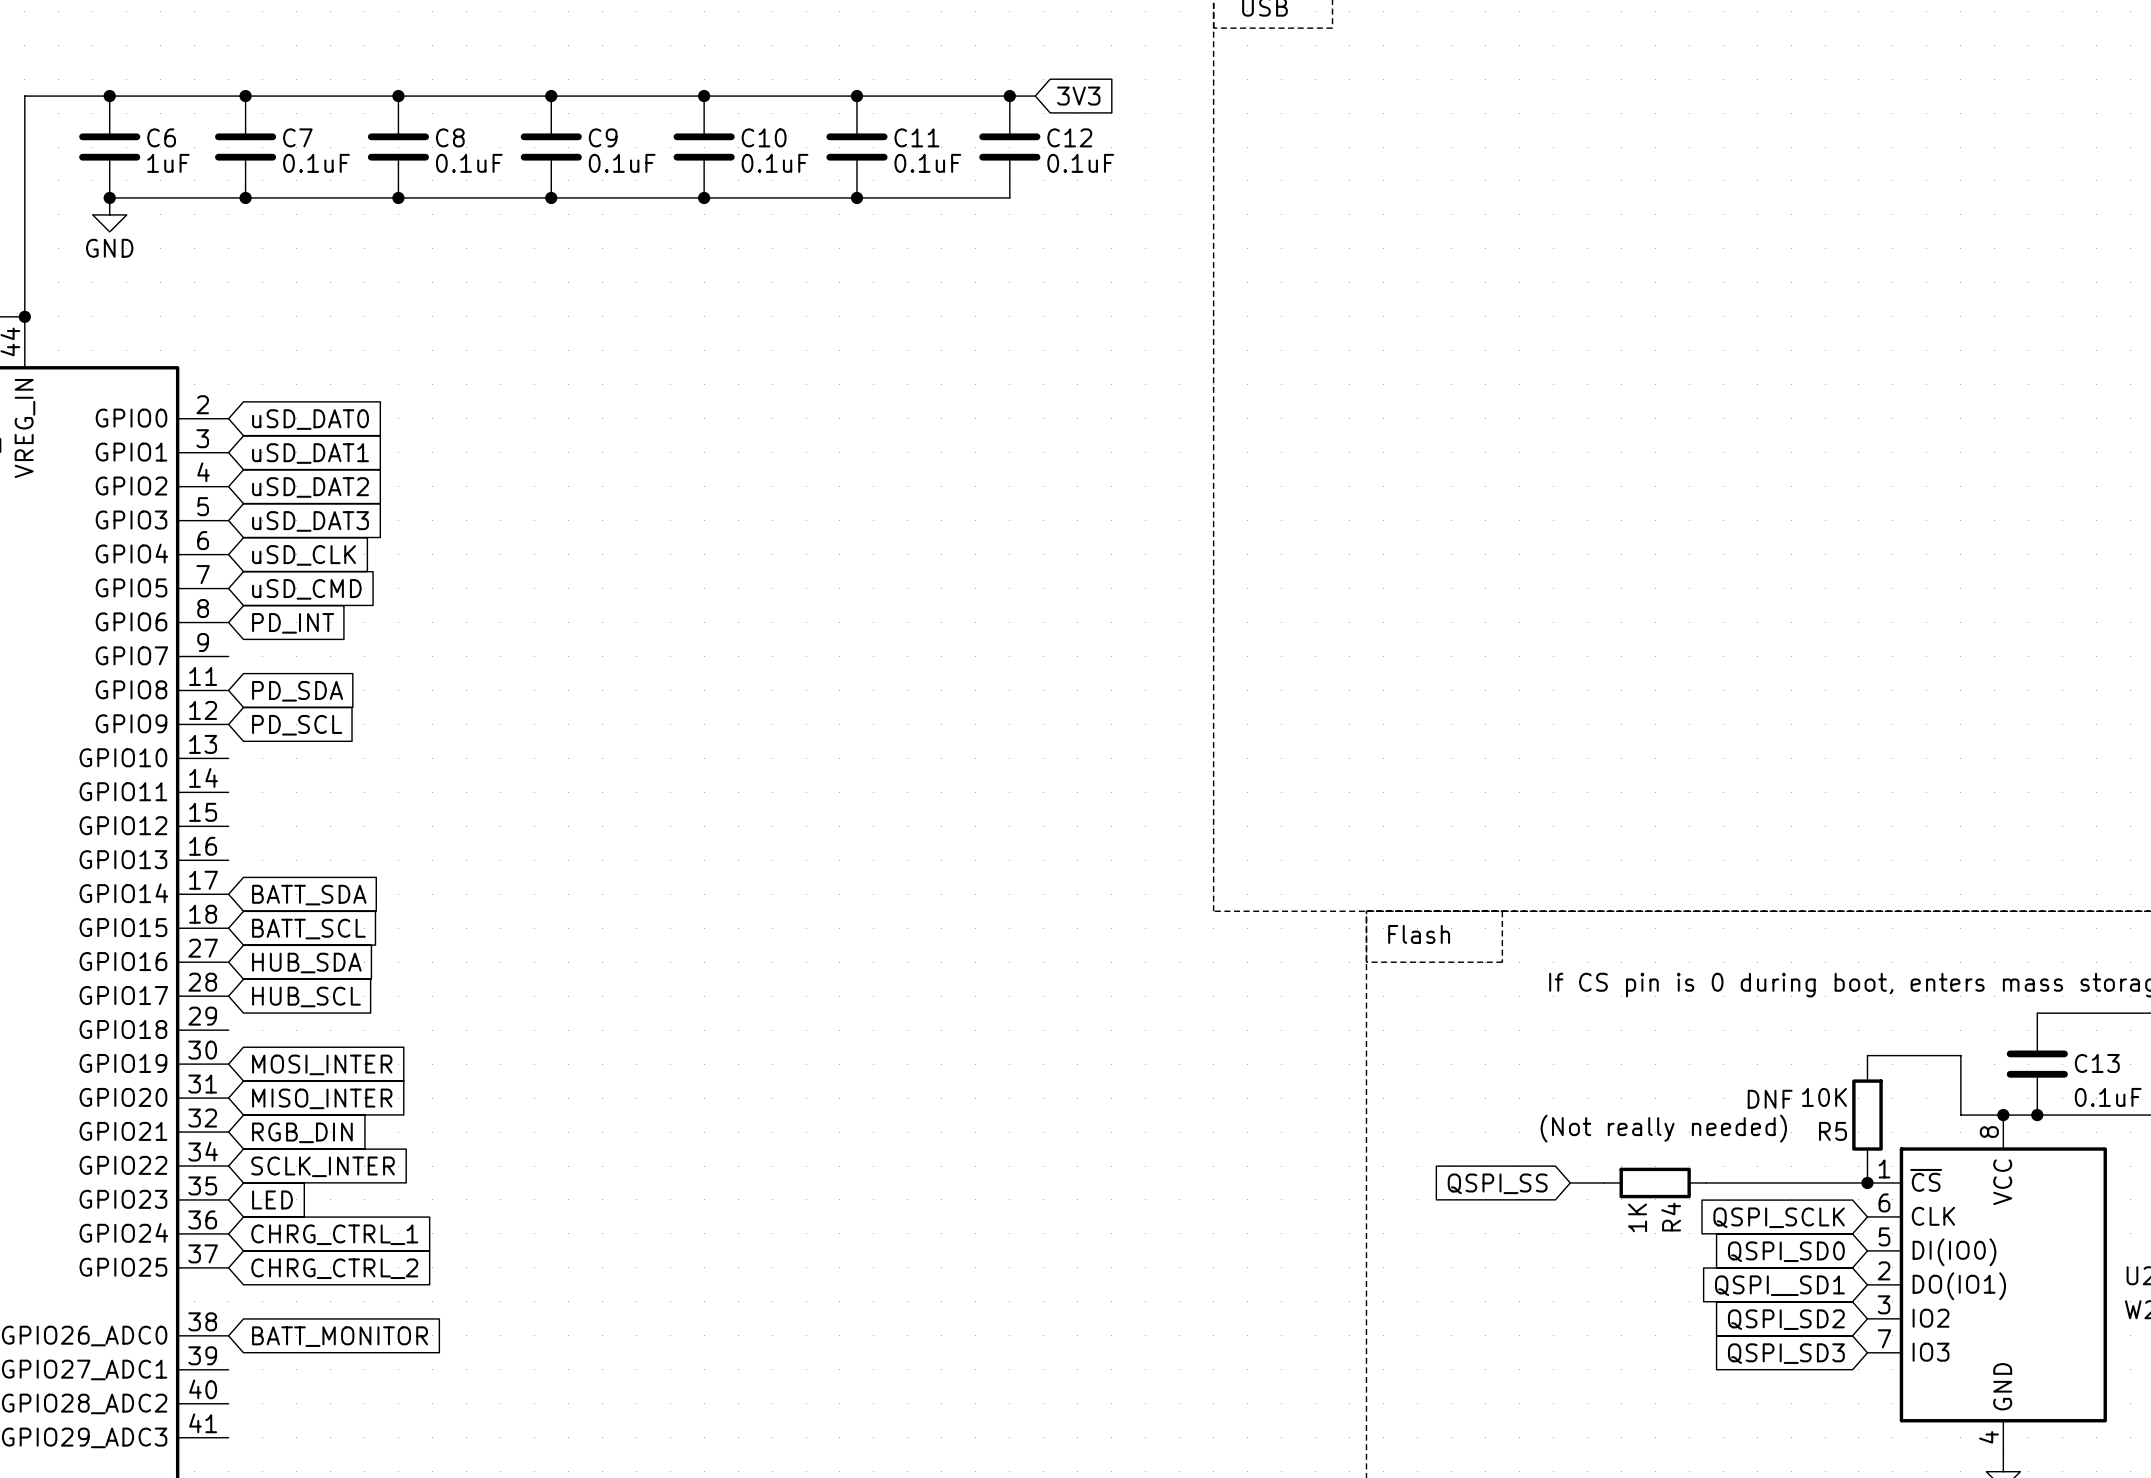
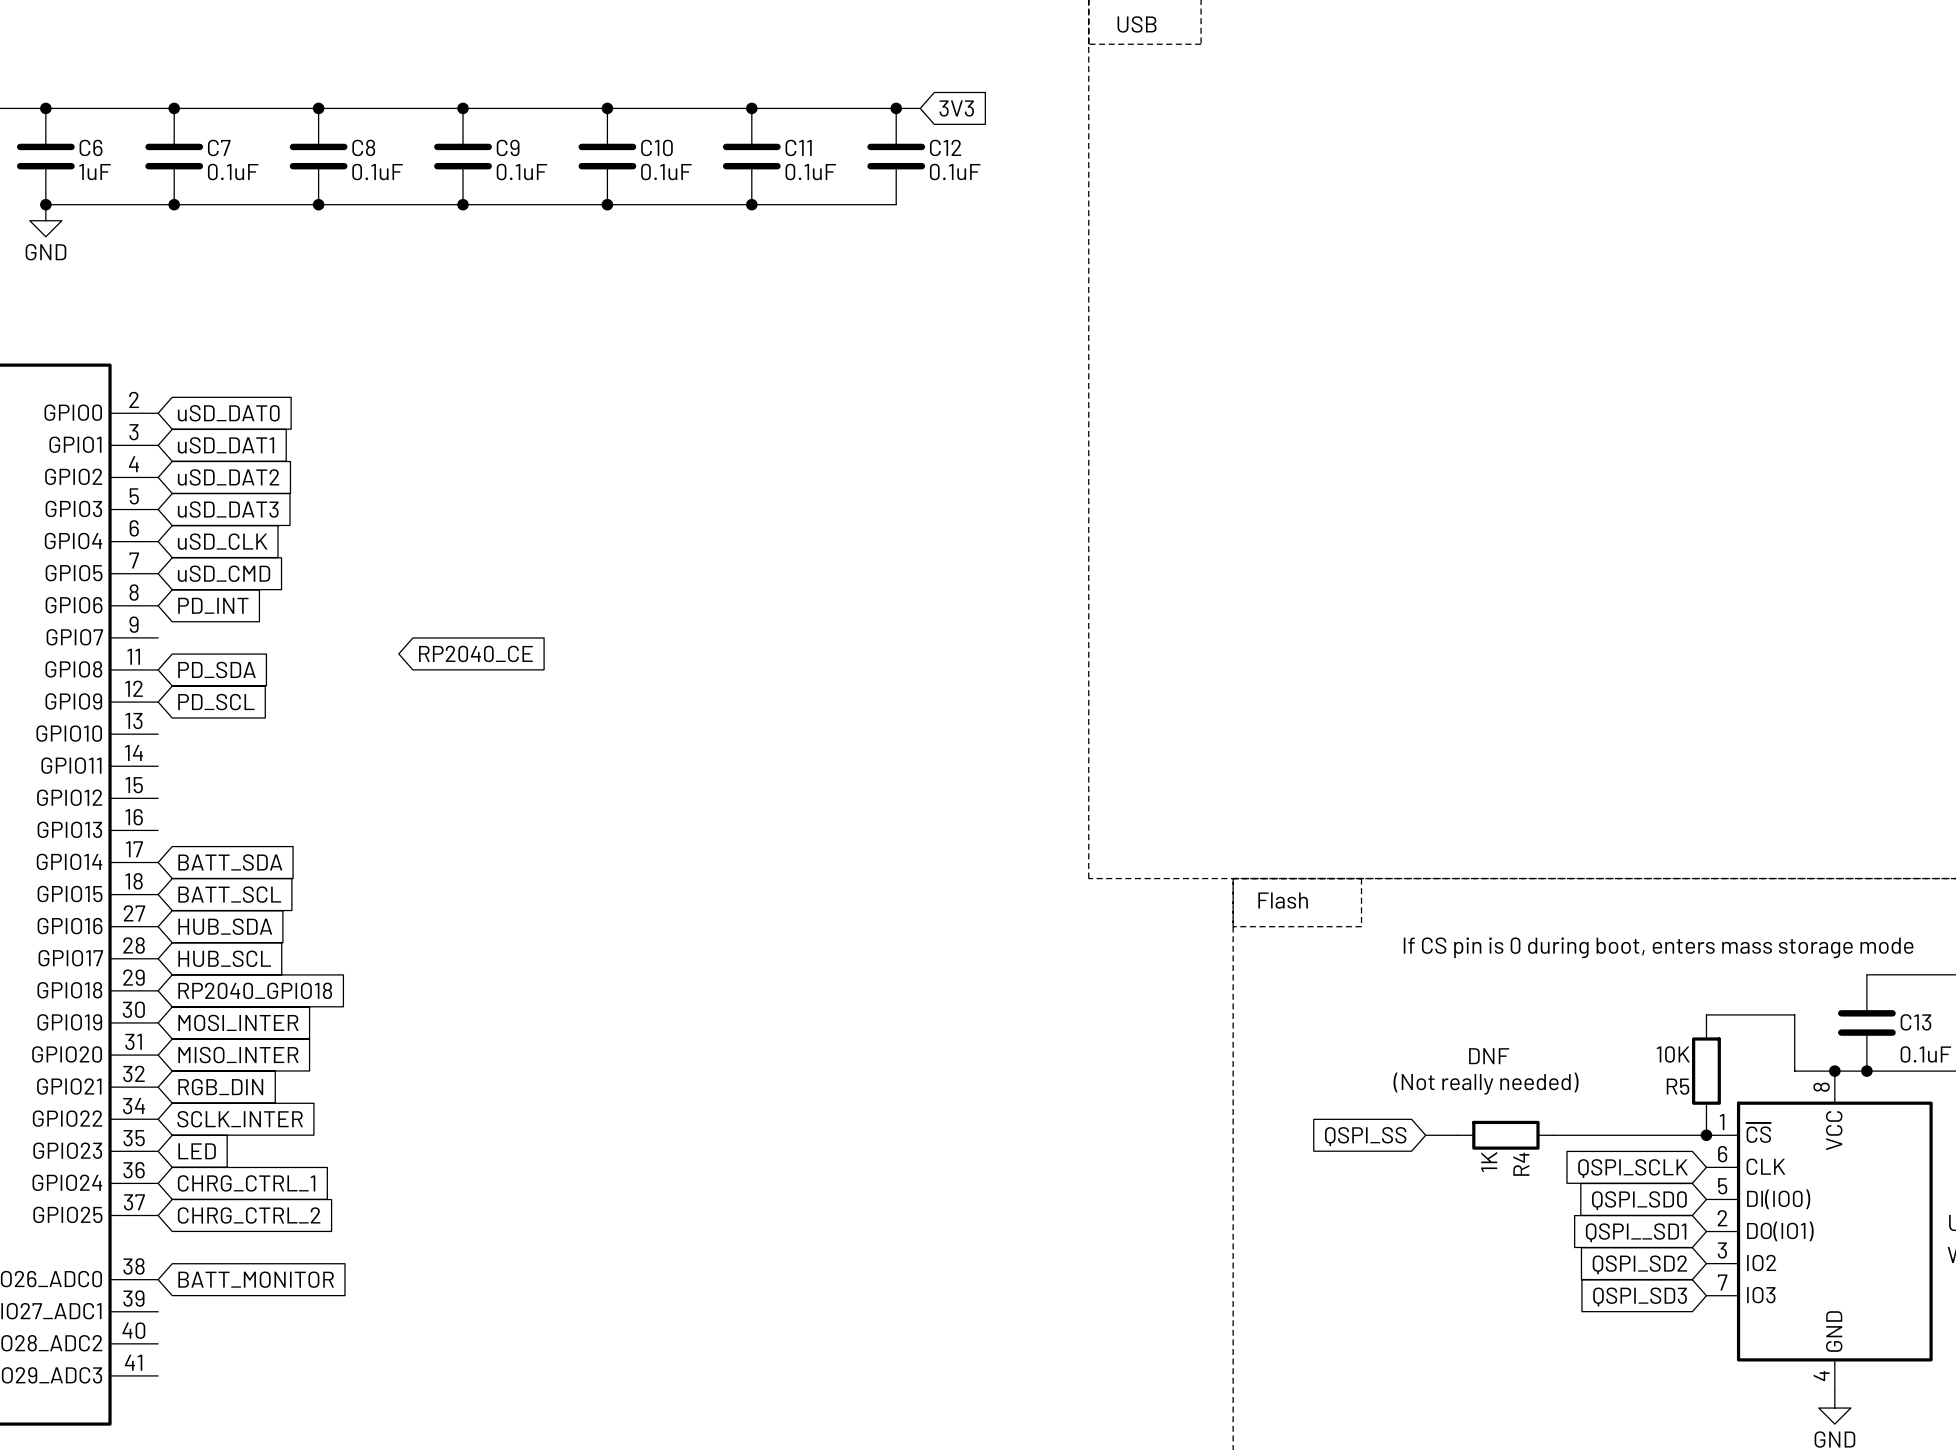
global label: none -> RP2040_CE (475, 653)
global label: none -> RP2040_GPIO18 (255, 990)

